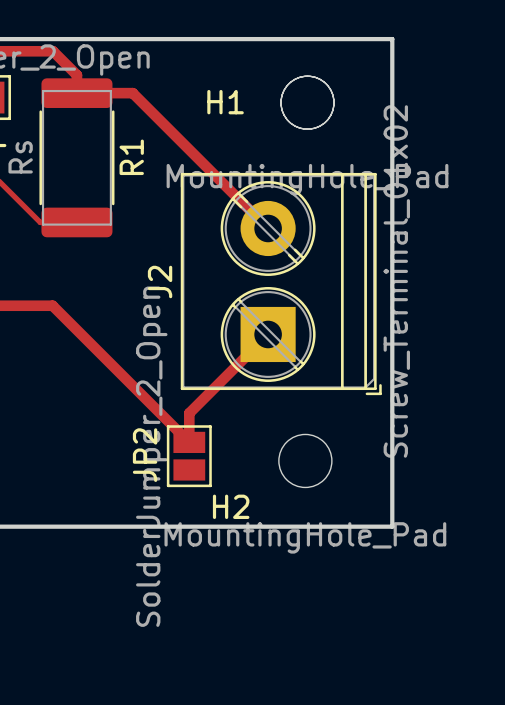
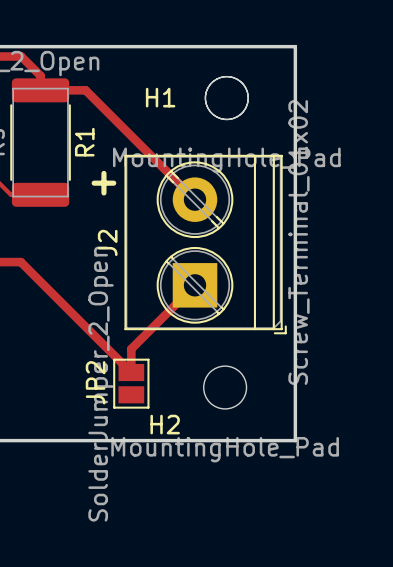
text: none -> + (103, 183)

